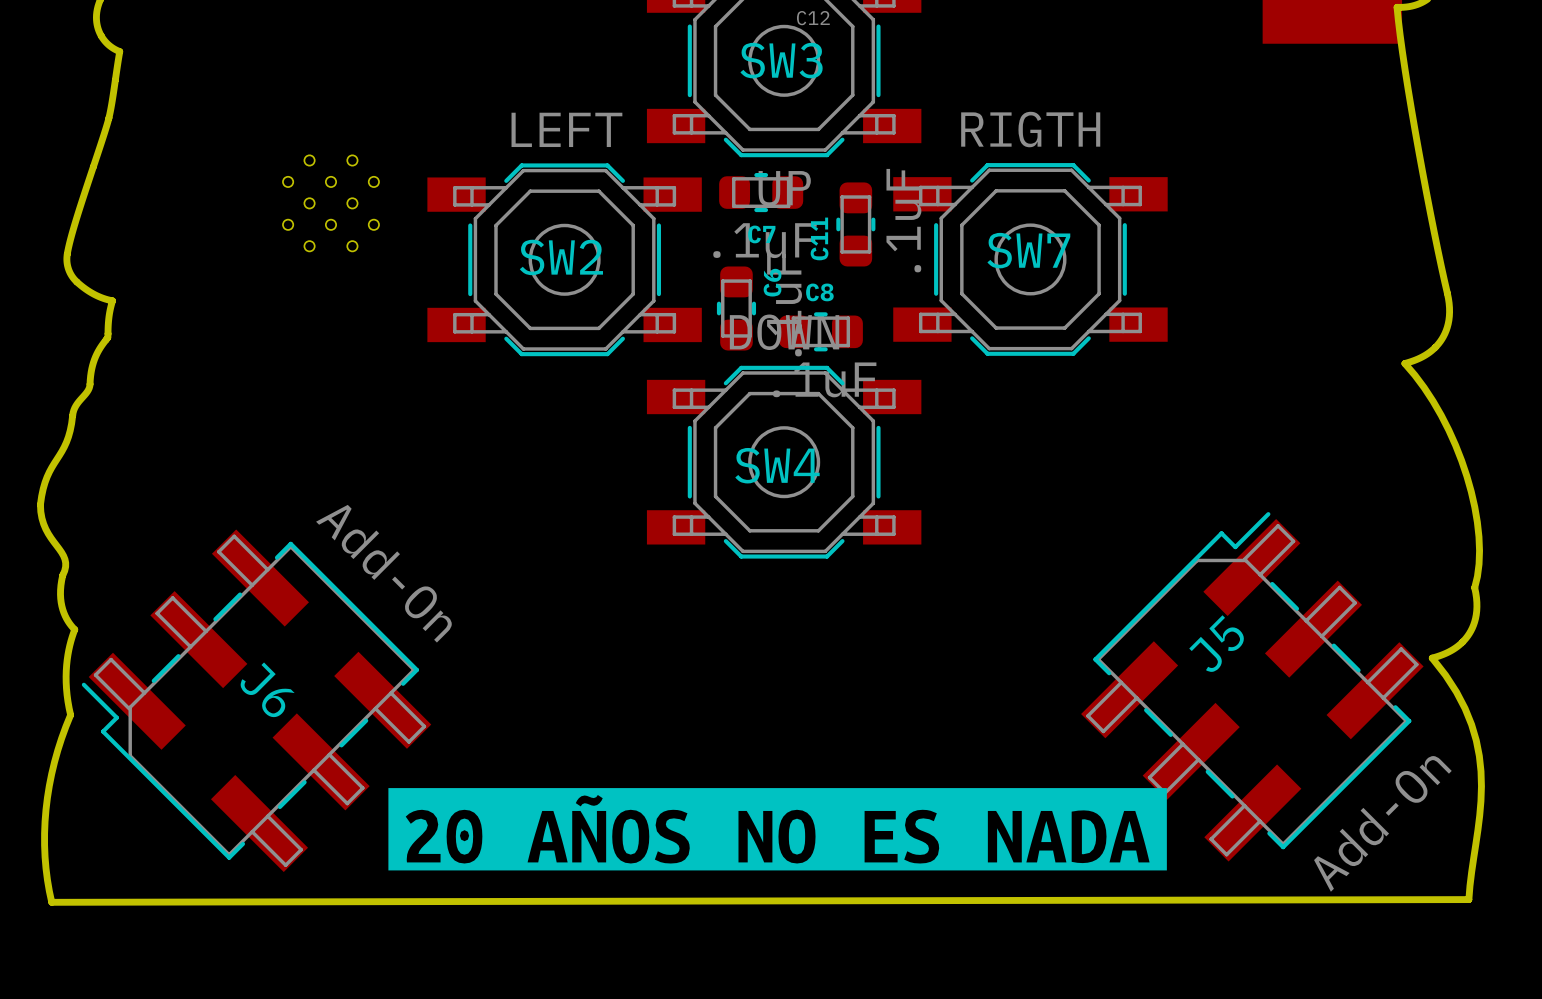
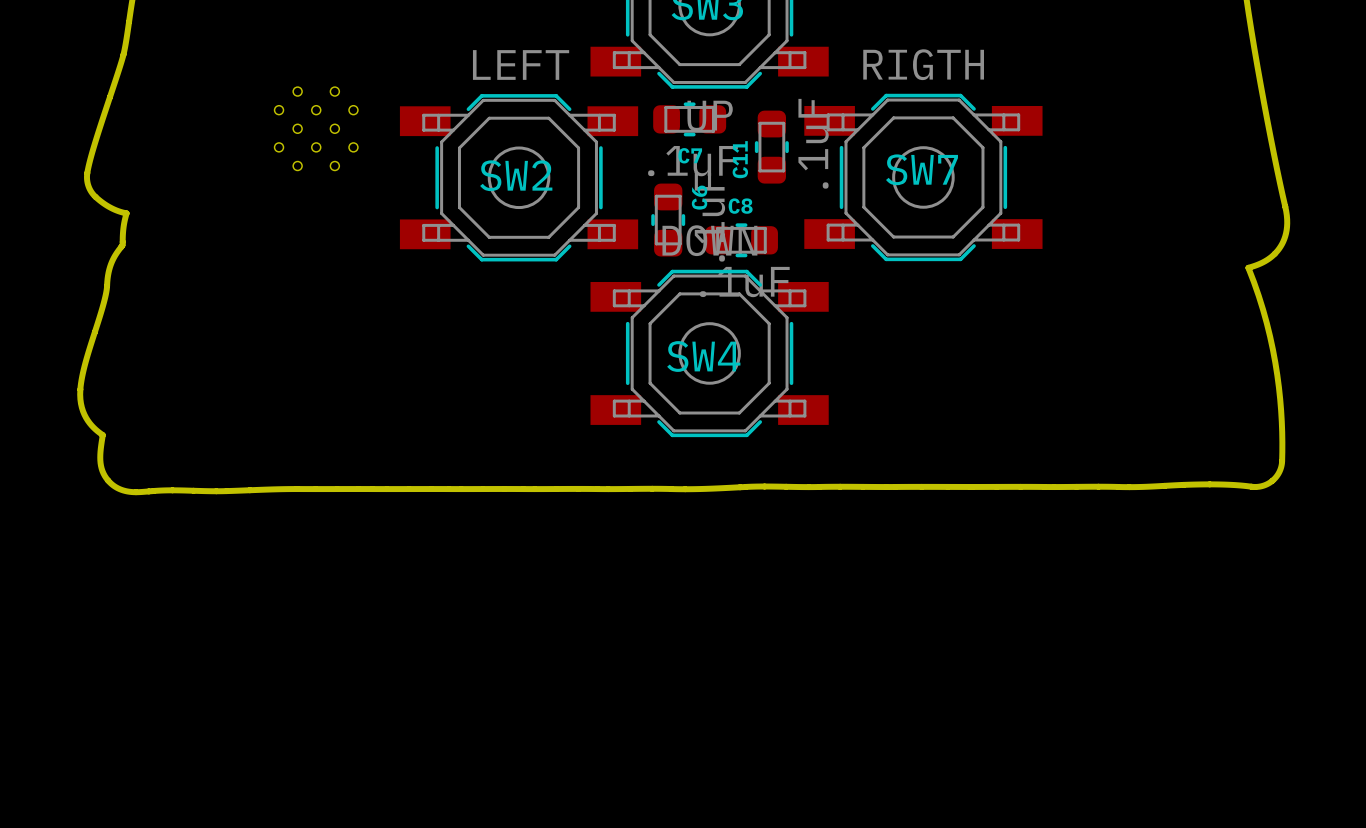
board edge: (1404, 363) (1424, 387) (1448, 430) (1466, 476) (1477, 522) (1479, 550) (1474, 587) (1476, 606) (1474, 621) (1469, 633) (1458, 645) (1447, 652) (1432, 658) (1445, 675) (1465, 708) (1471, 724) (1479, 756) (1480, 801) (1468, 899) (51, 902) (45, 856) (46, 809) (54, 762) (70, 715) (67, 694) (66, 670) (68, 650) (74, 629) (66, 618) (61, 602) (60, 585) (65, 566) (64, 559) (45, 529) (40, 504) (47, 476) (68, 436) (74, 407) (87, 391) (90, 384) -> (1248, 267) (1263, 309) (1272, 349) (1278, 387) (1282, 432) (1282, 462) (1279, 471) (1269, 482) (1256, 486) (1208, 484) (1131, 487) (762, 486) (688, 489) (293, 489) (127, 491) (113, 485) (103, 473) (100, 457) (102, 435) (87, 420) (80, 399) (83, 369) (107, 285)
J5: Add-On (1252, 686) -> none
J6: Add-On (256, 700) -> none
drawing: [388, 788, 1167, 871] -> none

